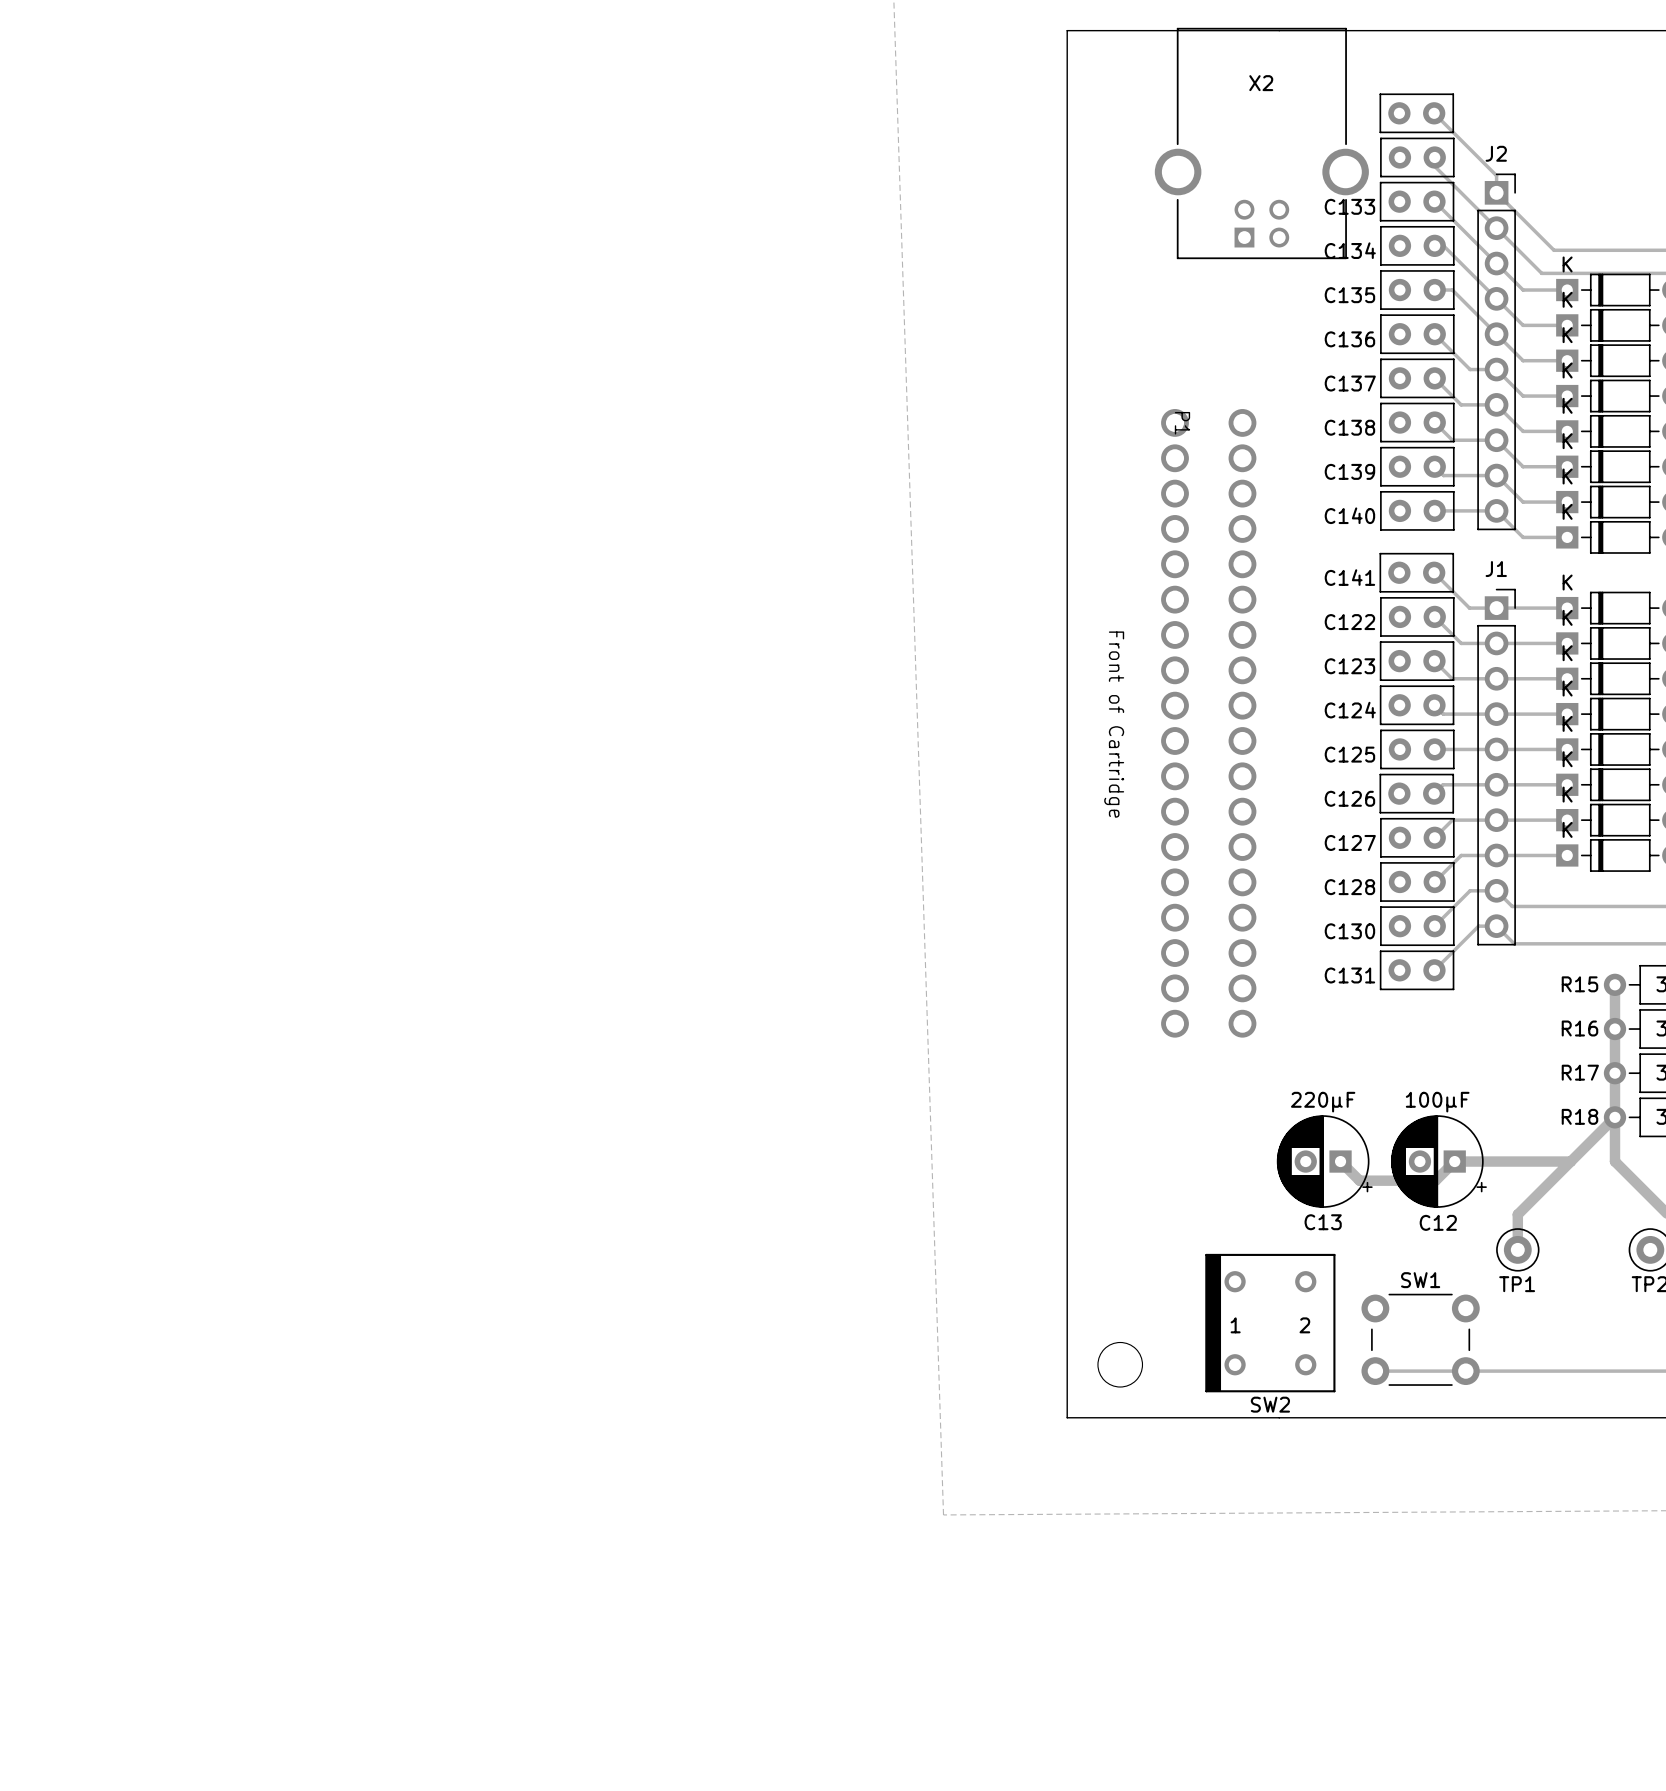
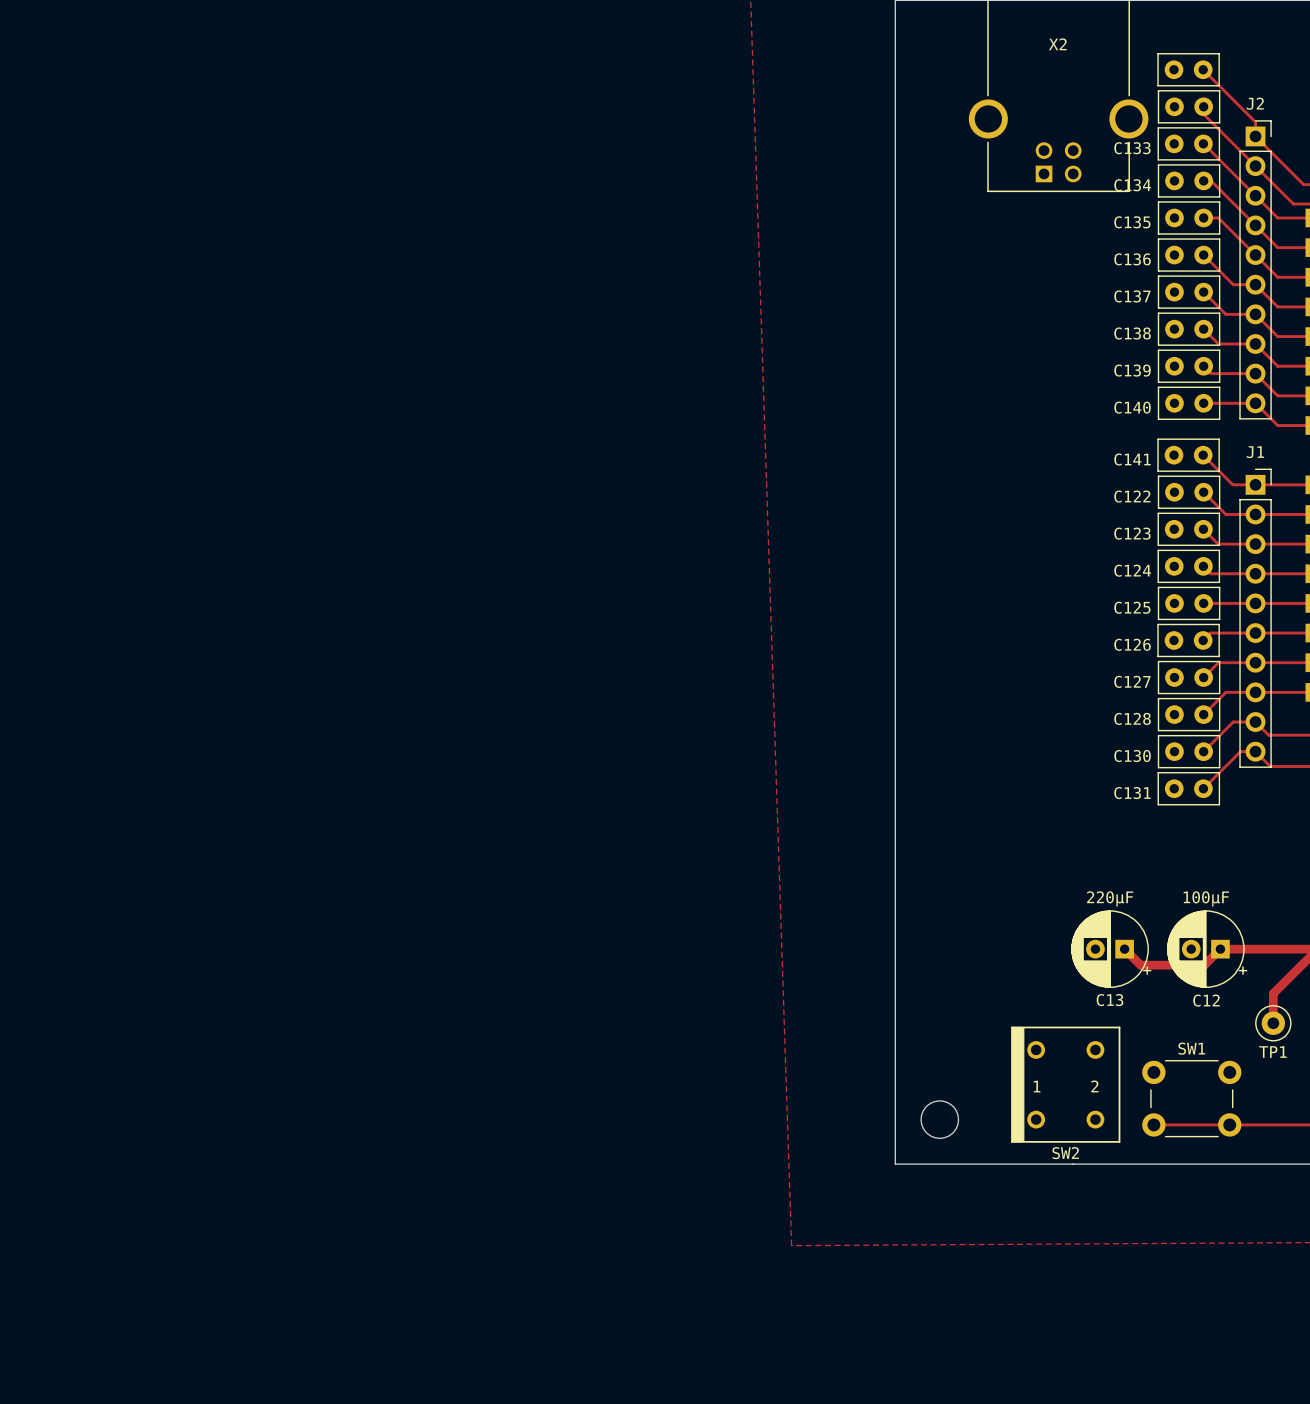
P1: (1208, 723) -> none

